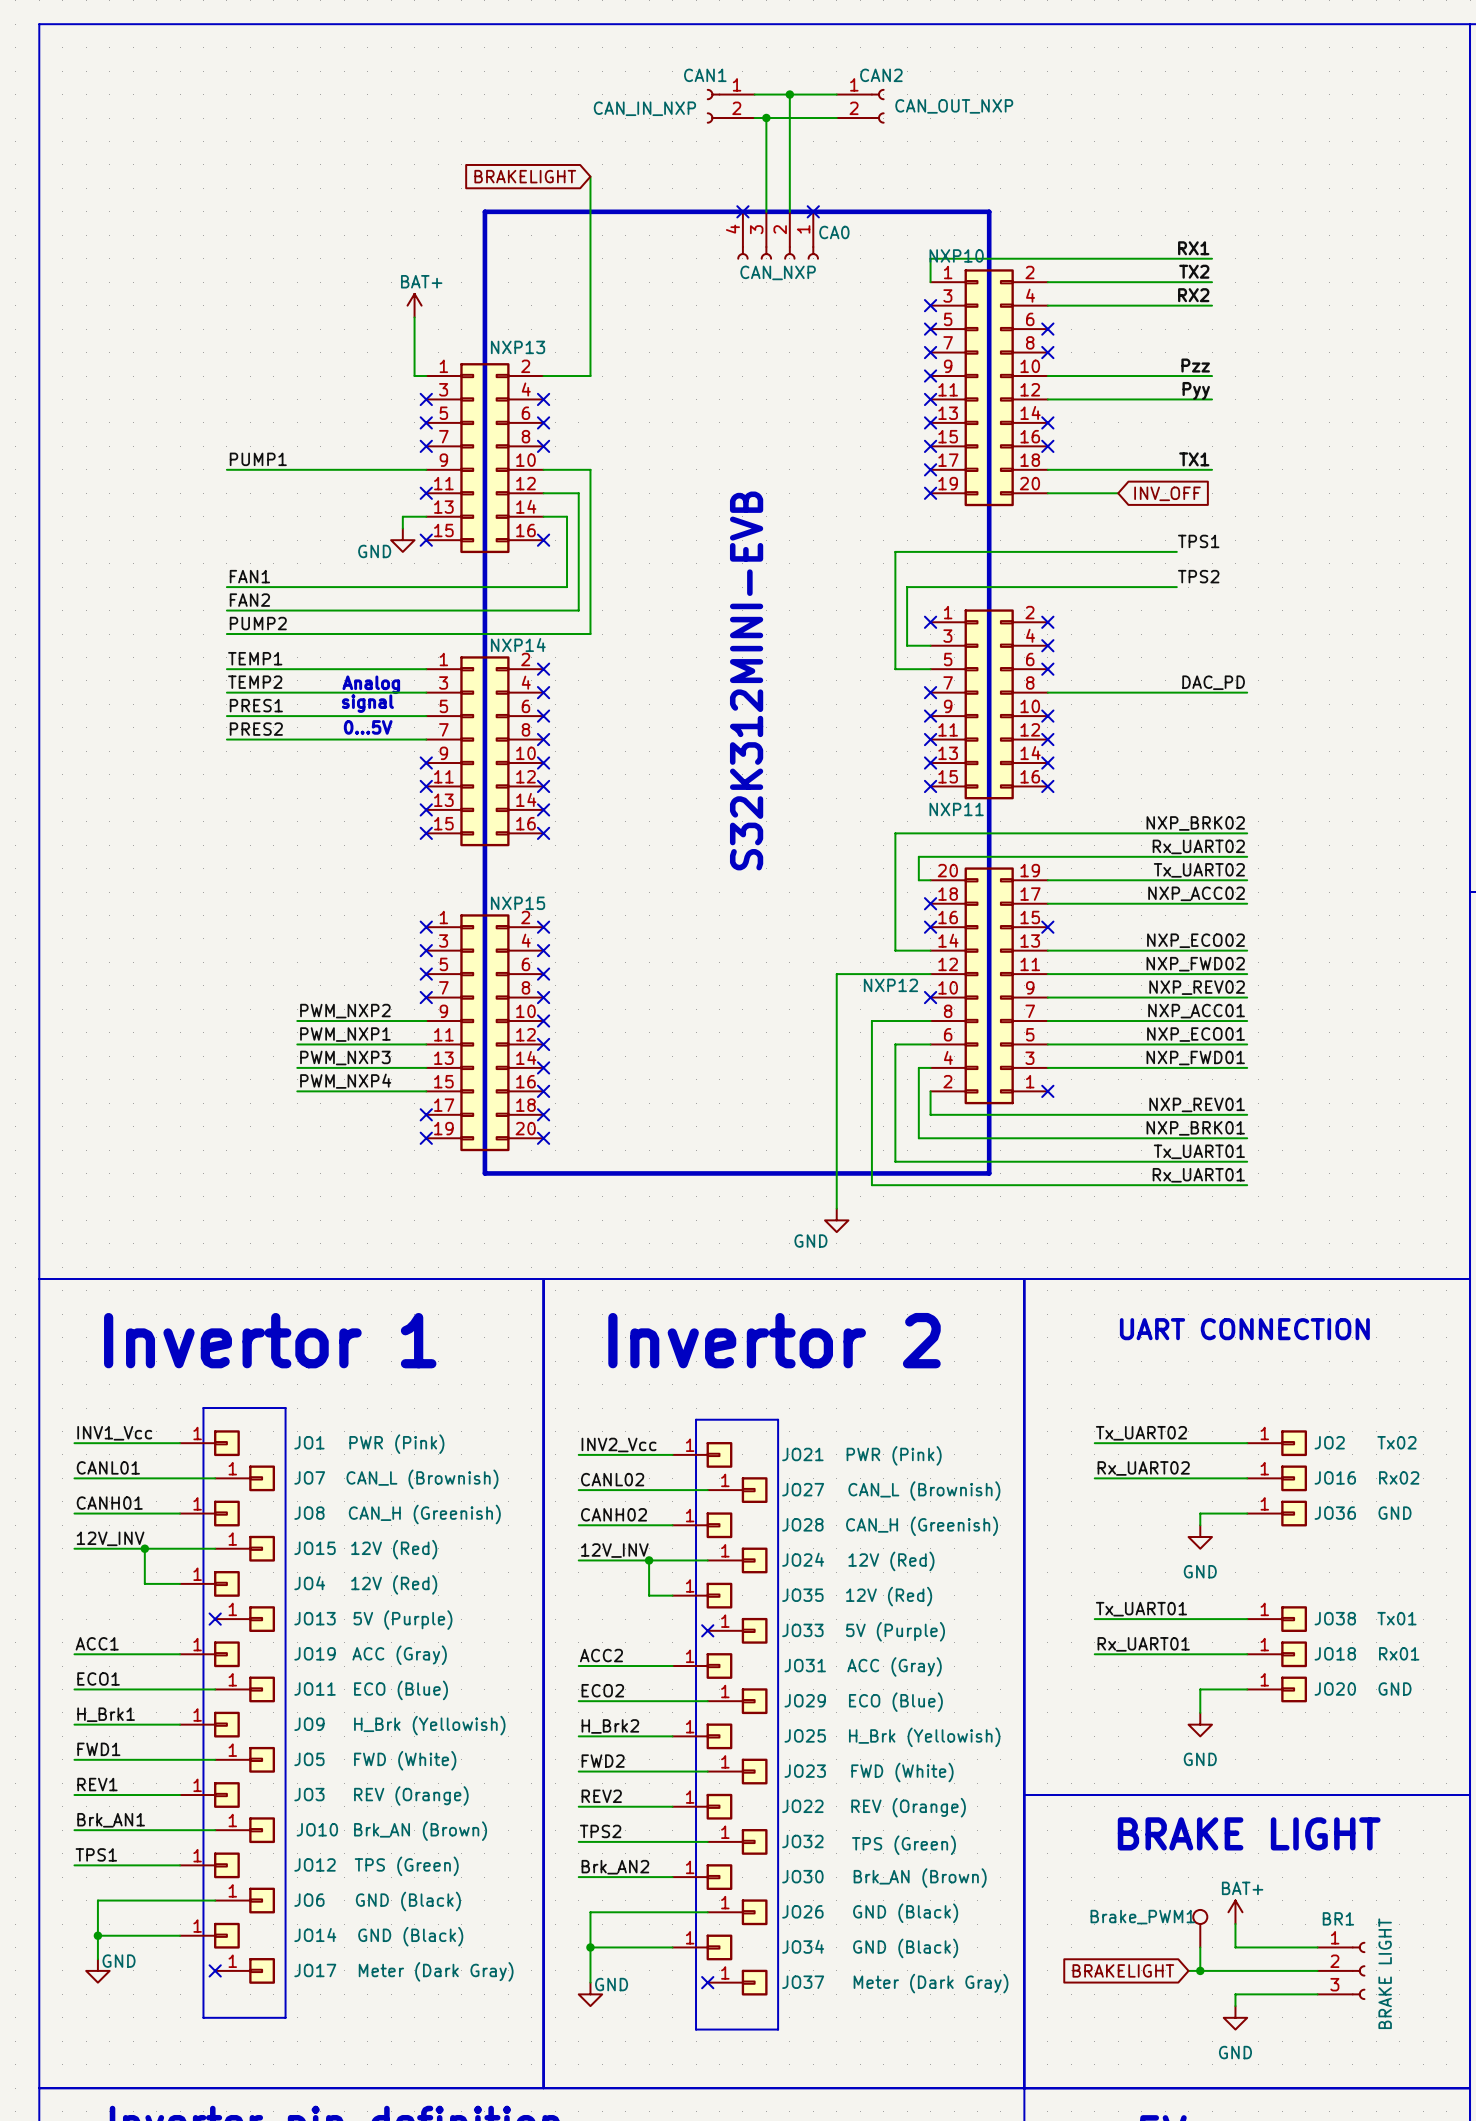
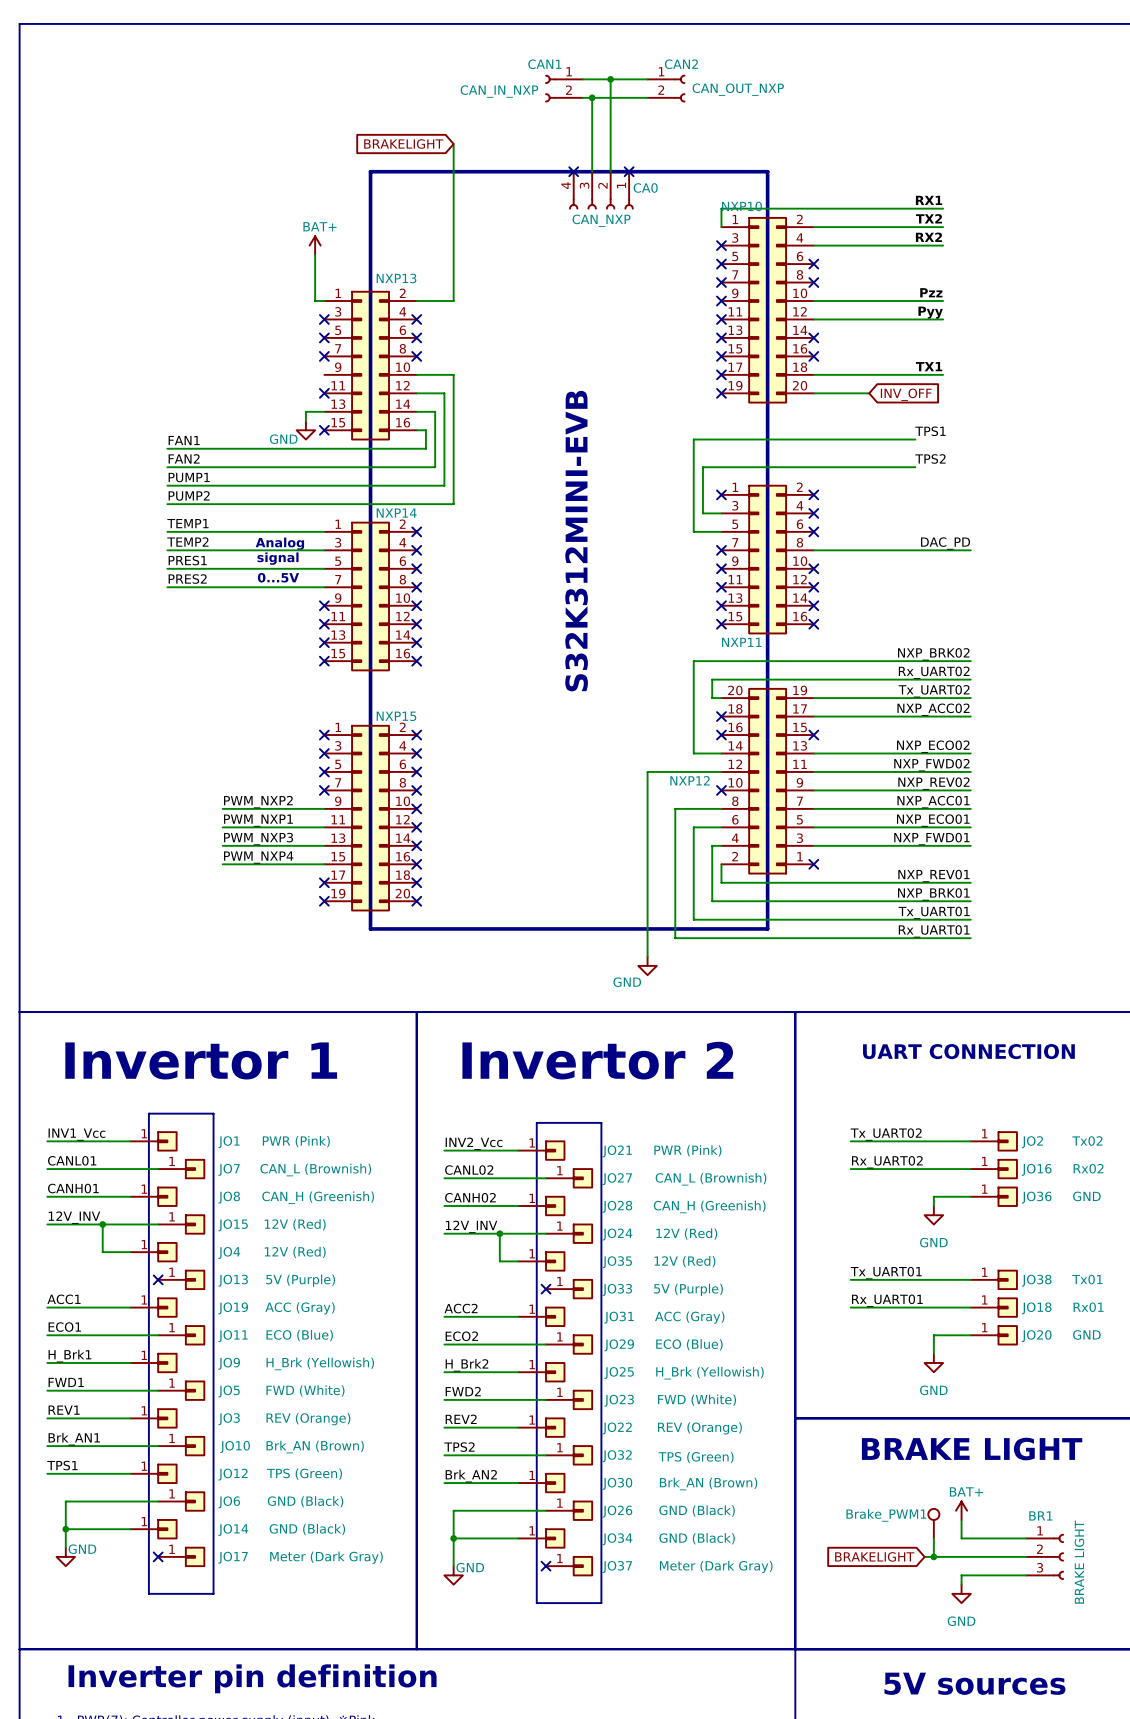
label: PUMP1 (258, 459) -> none
wire: (226, 469) (426, 469) -> none
wire: none -> (416, 430) (425, 430) (425, 448) (167, 448)
no-connect mark: (543, 540) -> none
label: none -> FAN1 (184, 440)
label: FAN1 (249, 576) -> FAN2 (184, 458)
label: FAN2 (249, 600) -> PUMP1 (189, 477)

